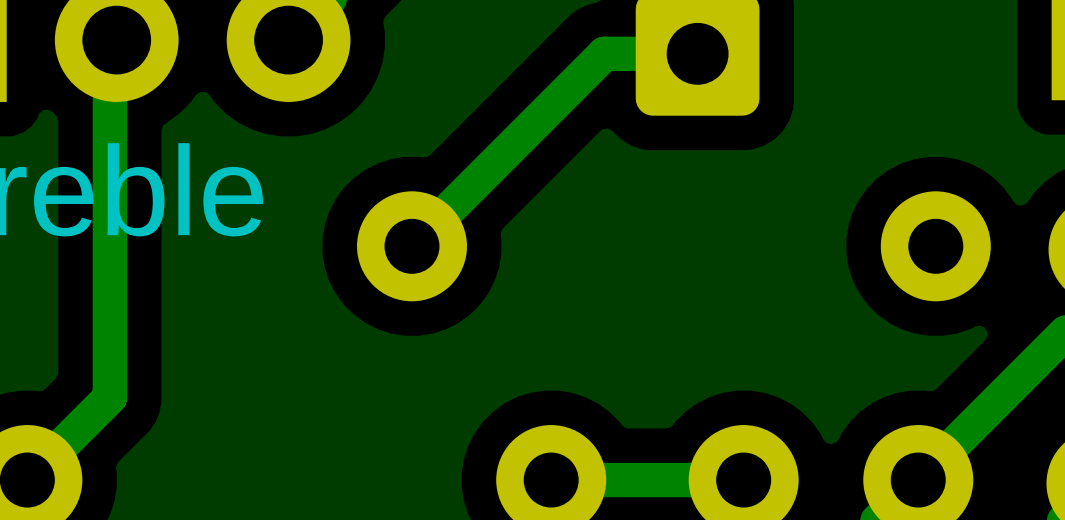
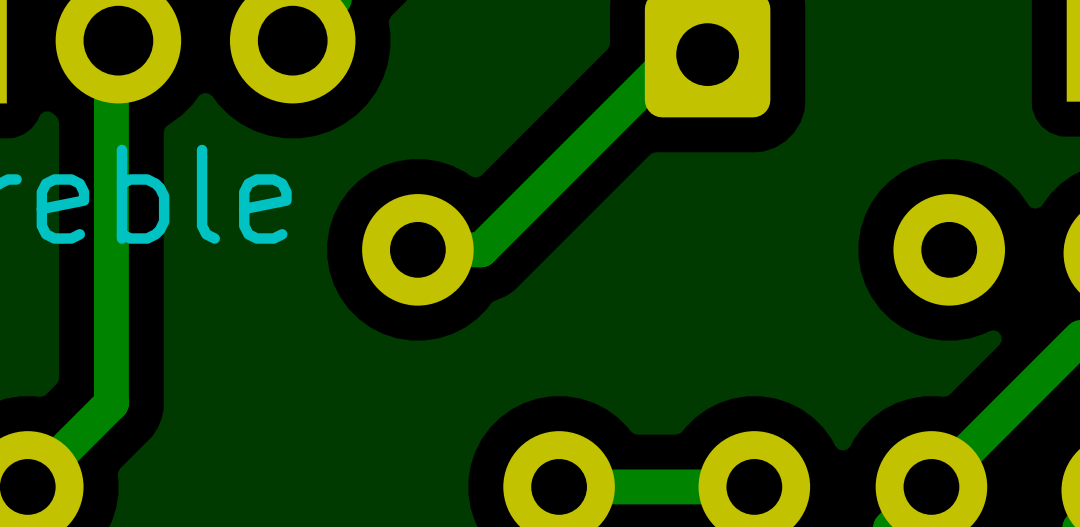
track: (666, 53) (604, 53) (411, 246) -> (676, 54) (480, 249) (417, 249)

